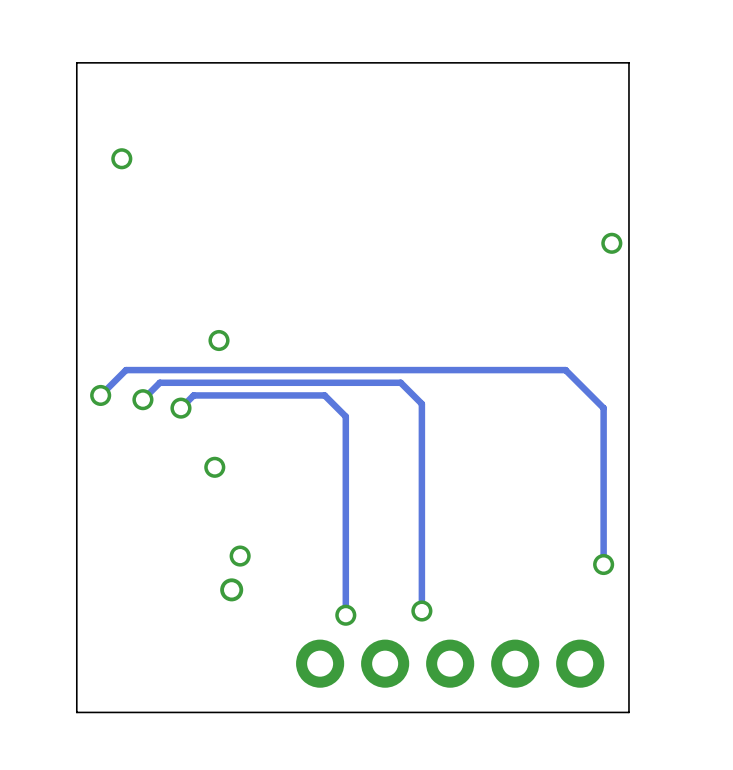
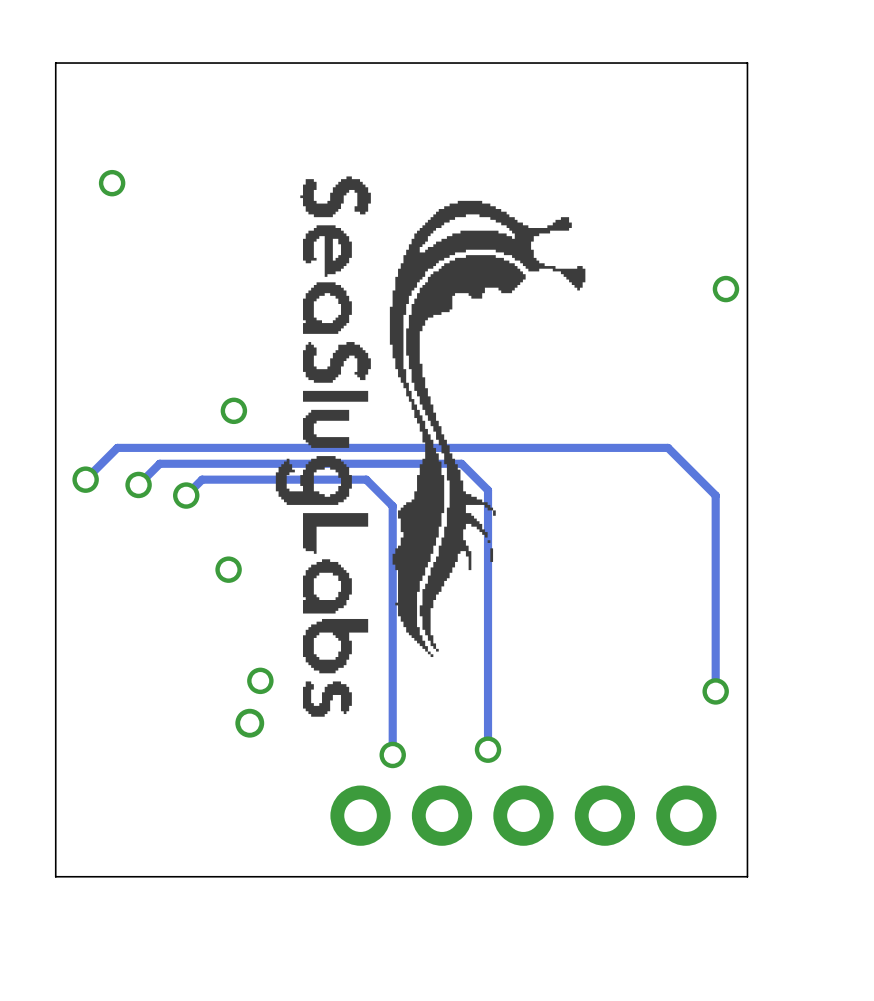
drawing: none -> [275, 176, 586, 717]

